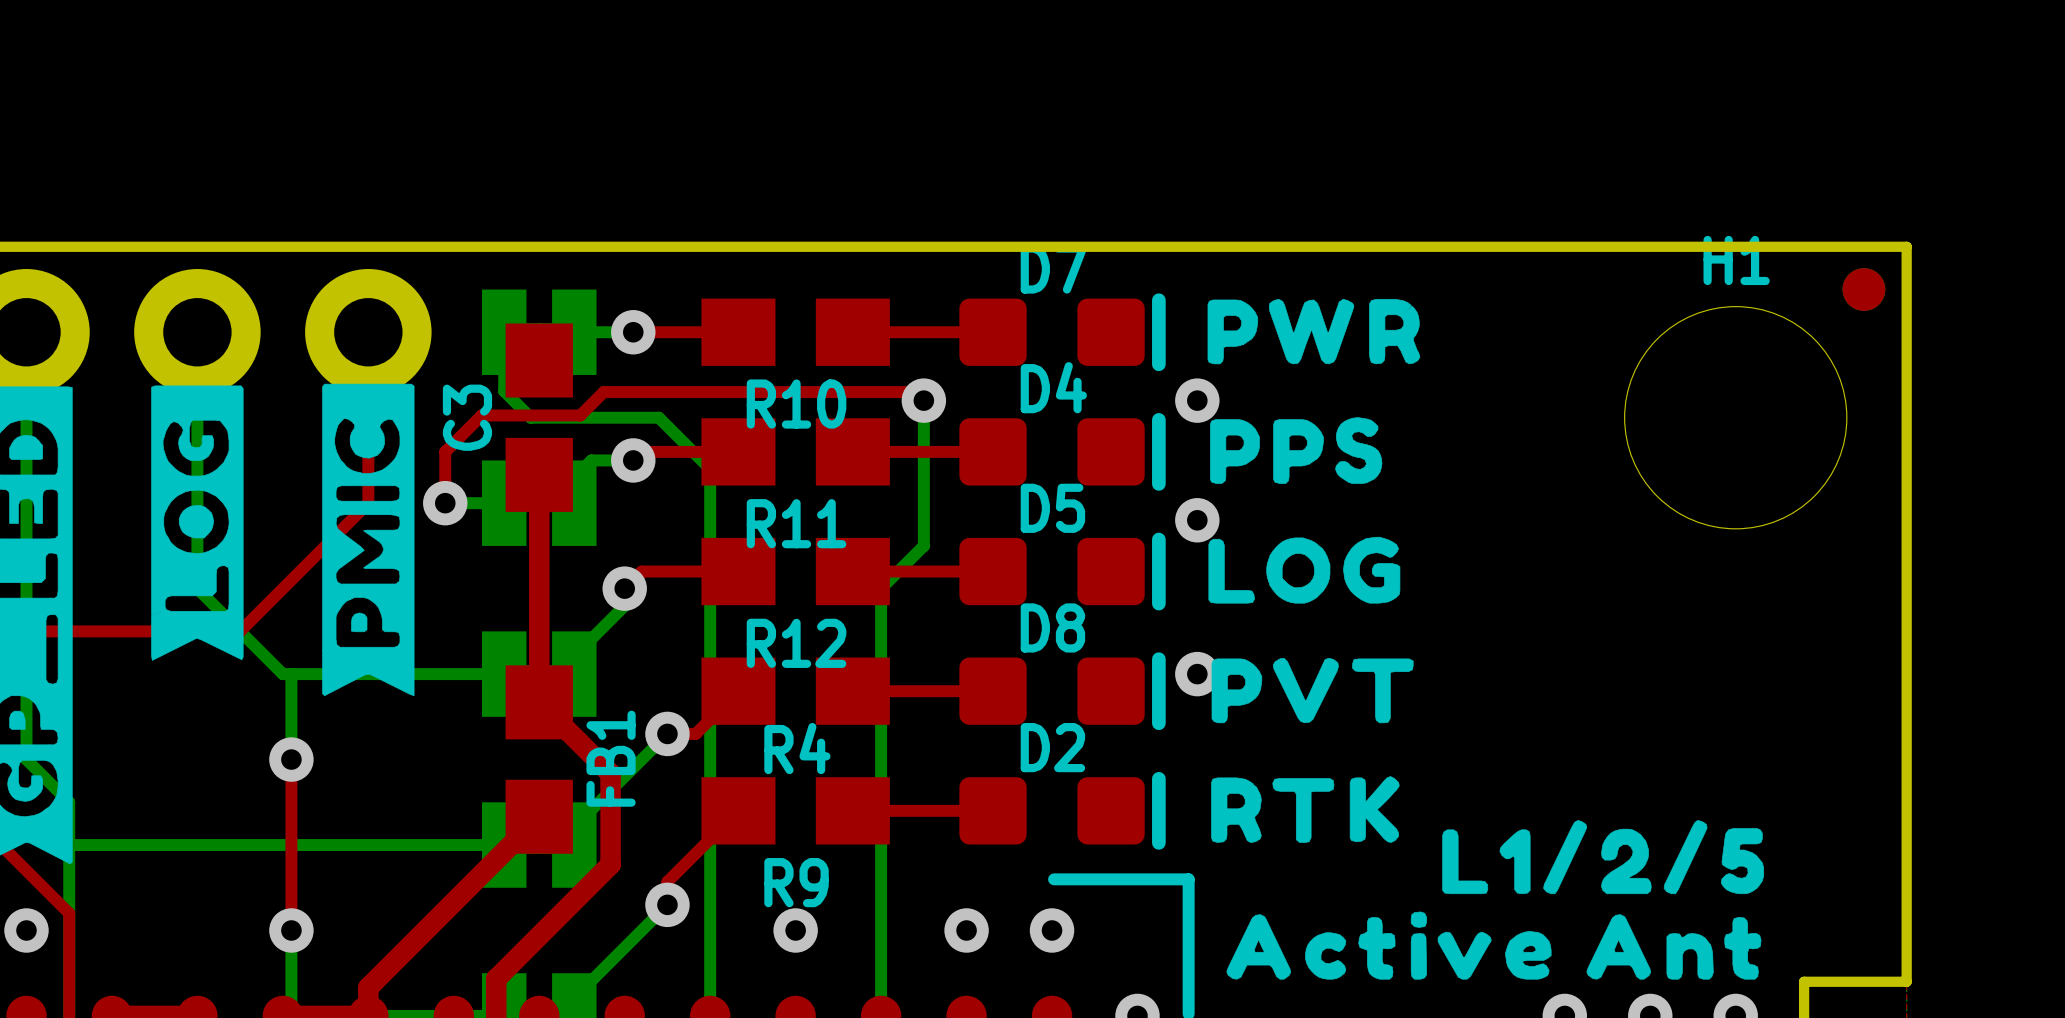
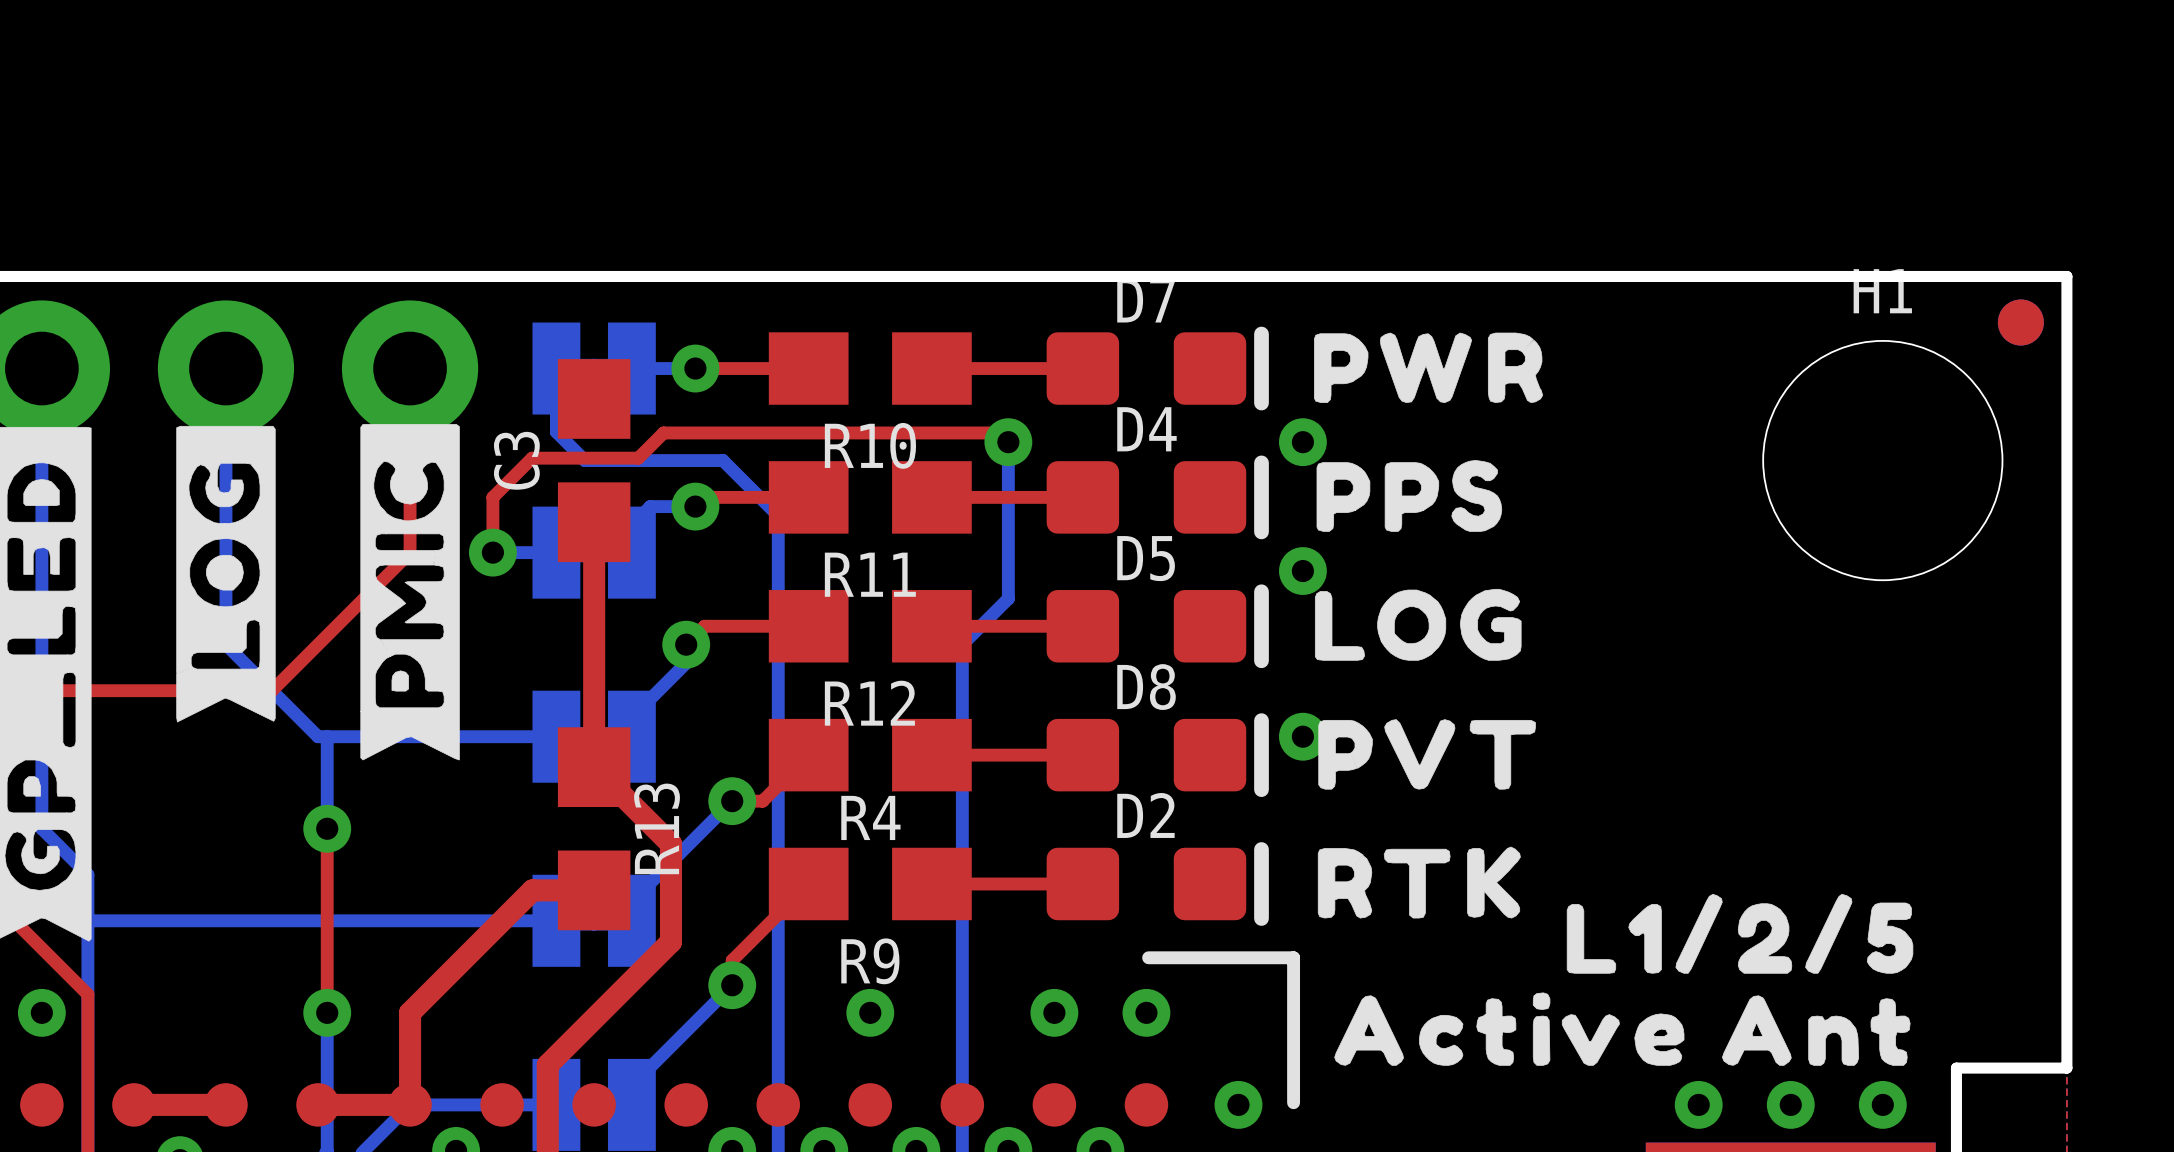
FB1 name: FB1 (611, 758) -> R13 (657, 828)
top track: (539, 816) (368, 987) -> (594, 890) (532, 890) (410, 1012) (410, 1074)

